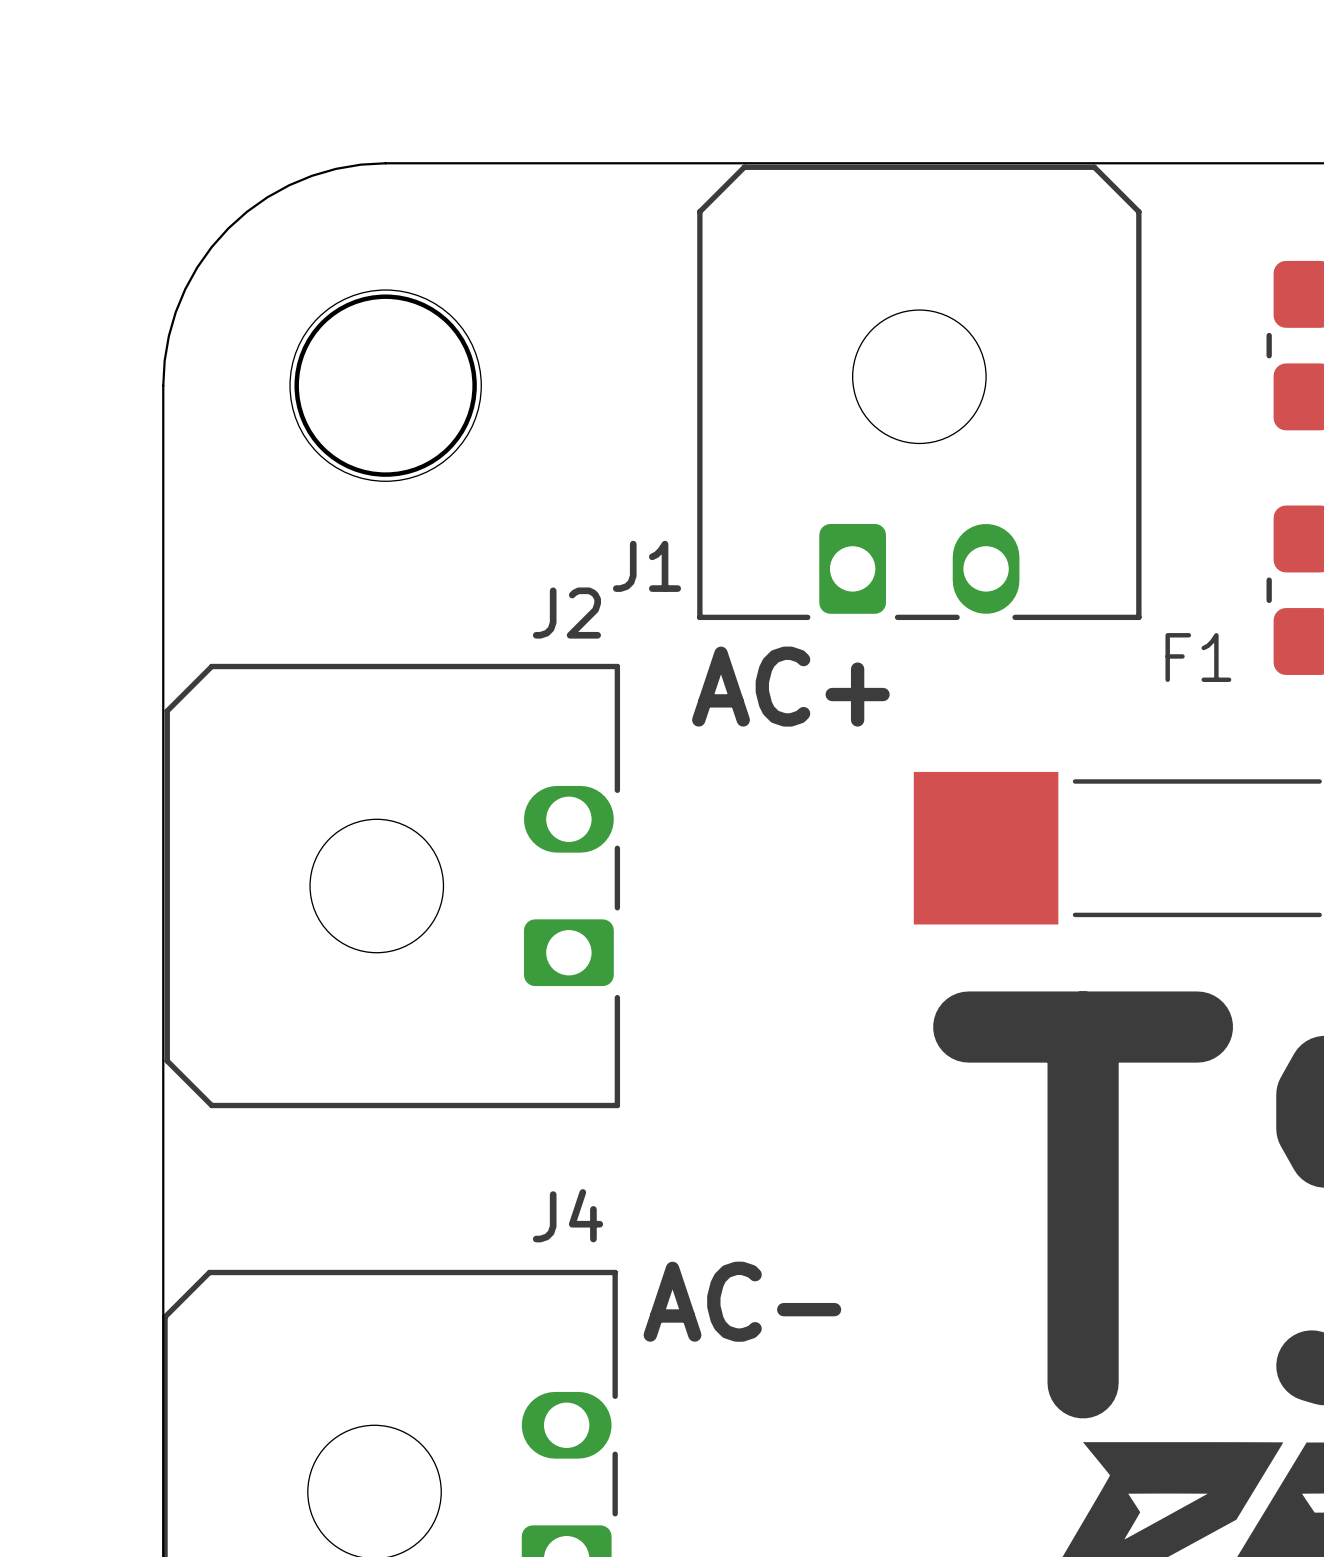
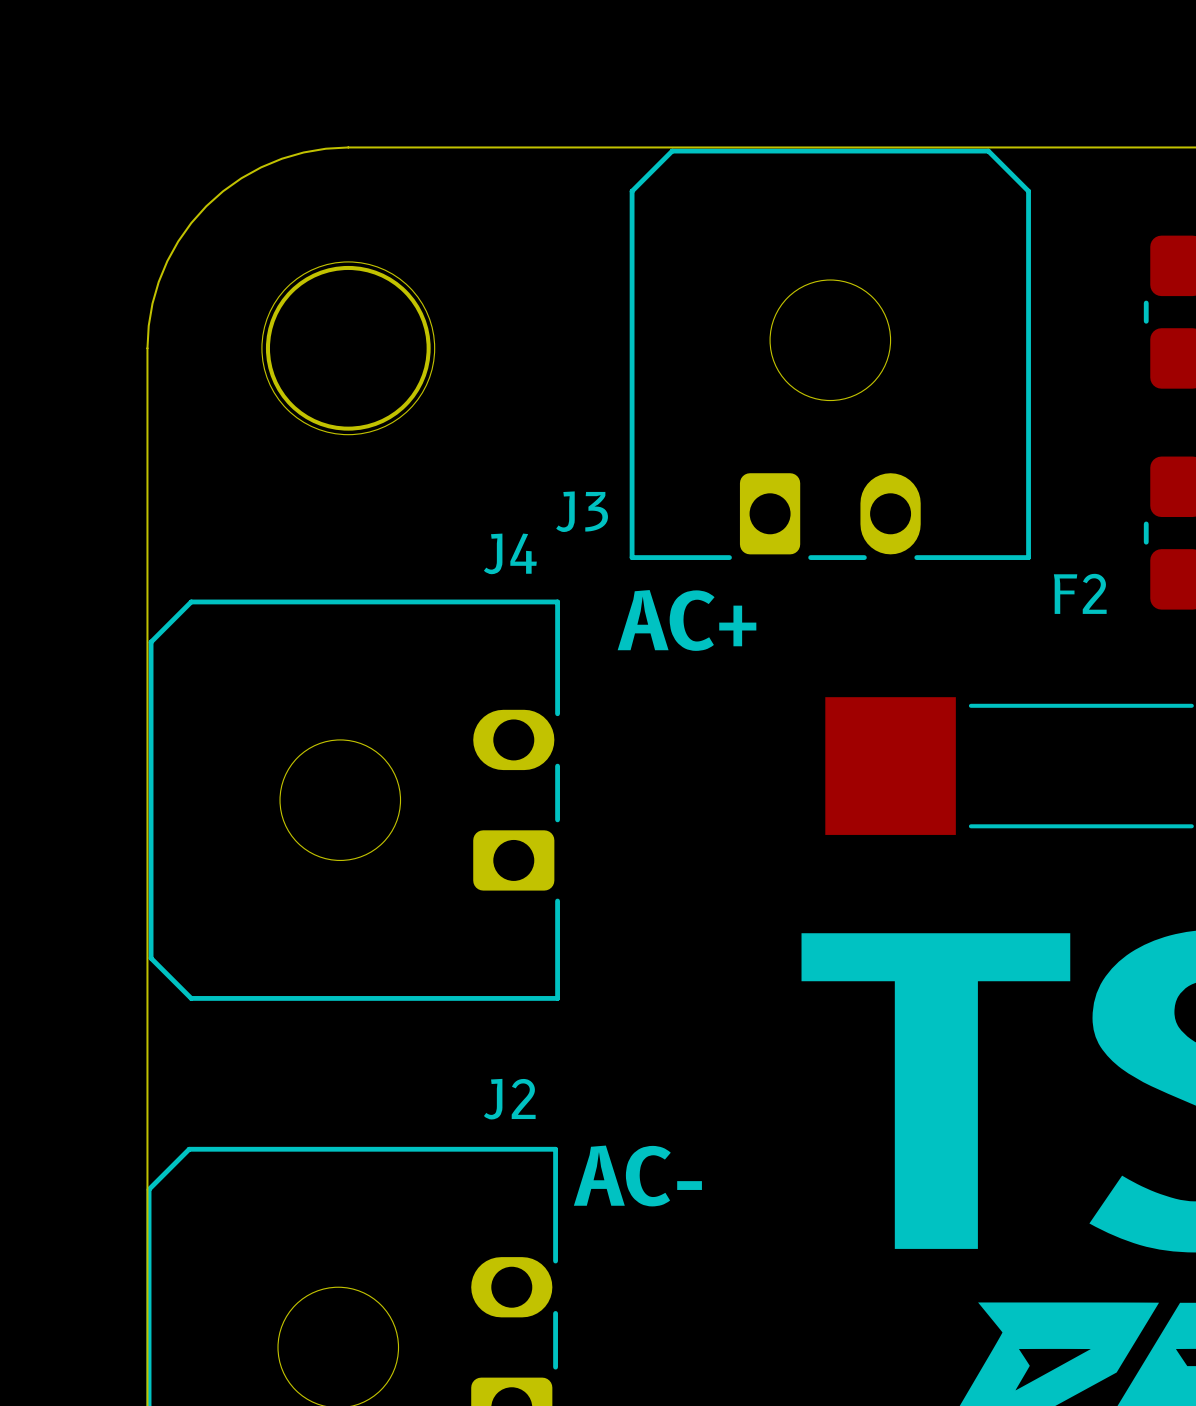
J1 name: J1 (647, 566) -> J3 (582, 511)
J2 name: J2 (566, 613) -> J4 (510, 553)
F1 name: F1 (1198, 657) -> F2 (1080, 593)
J4 name: J4 (568, 1215) -> J2 (509, 1099)

